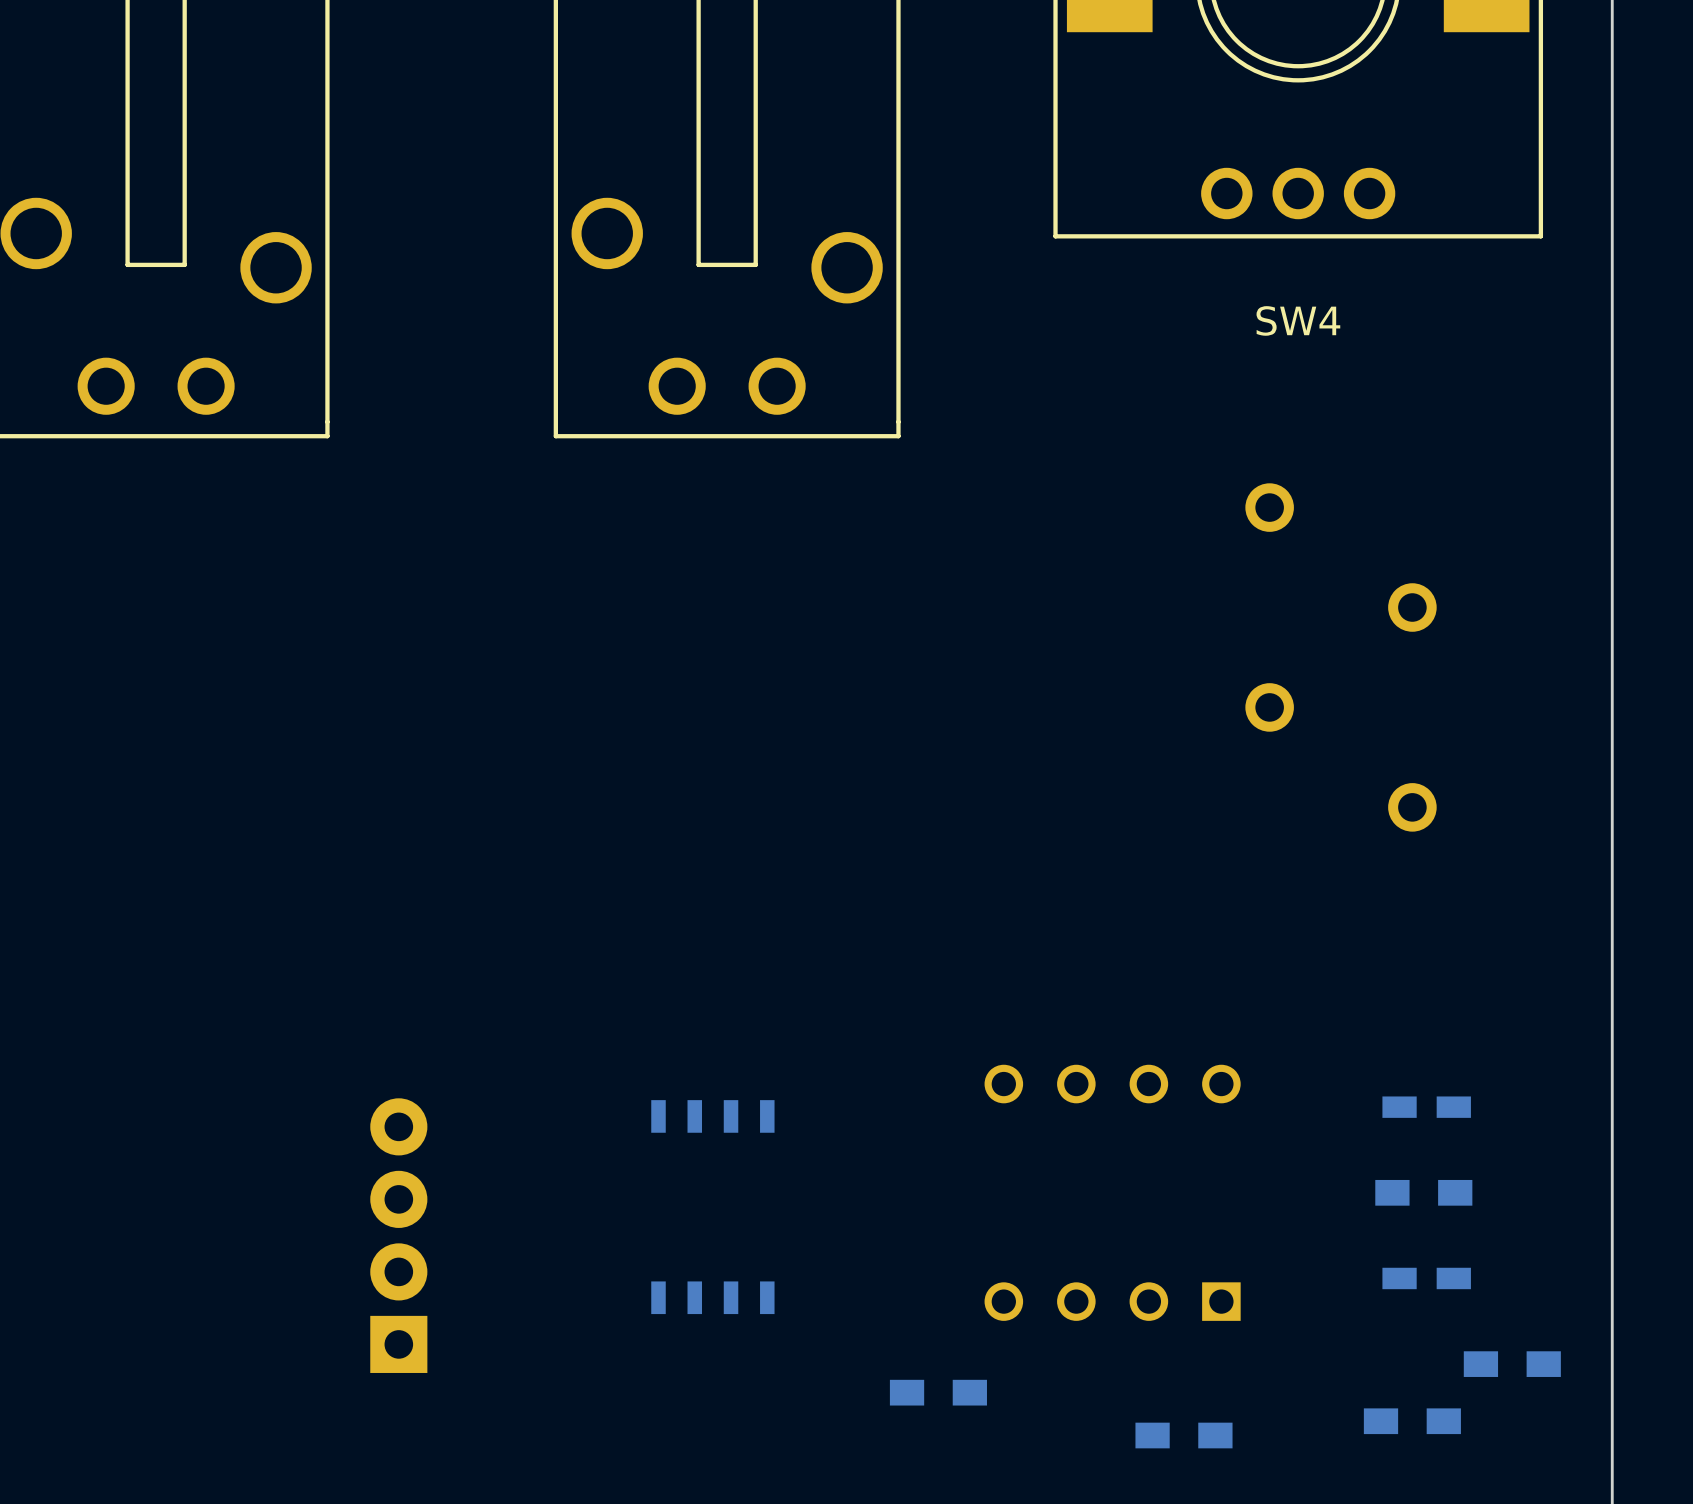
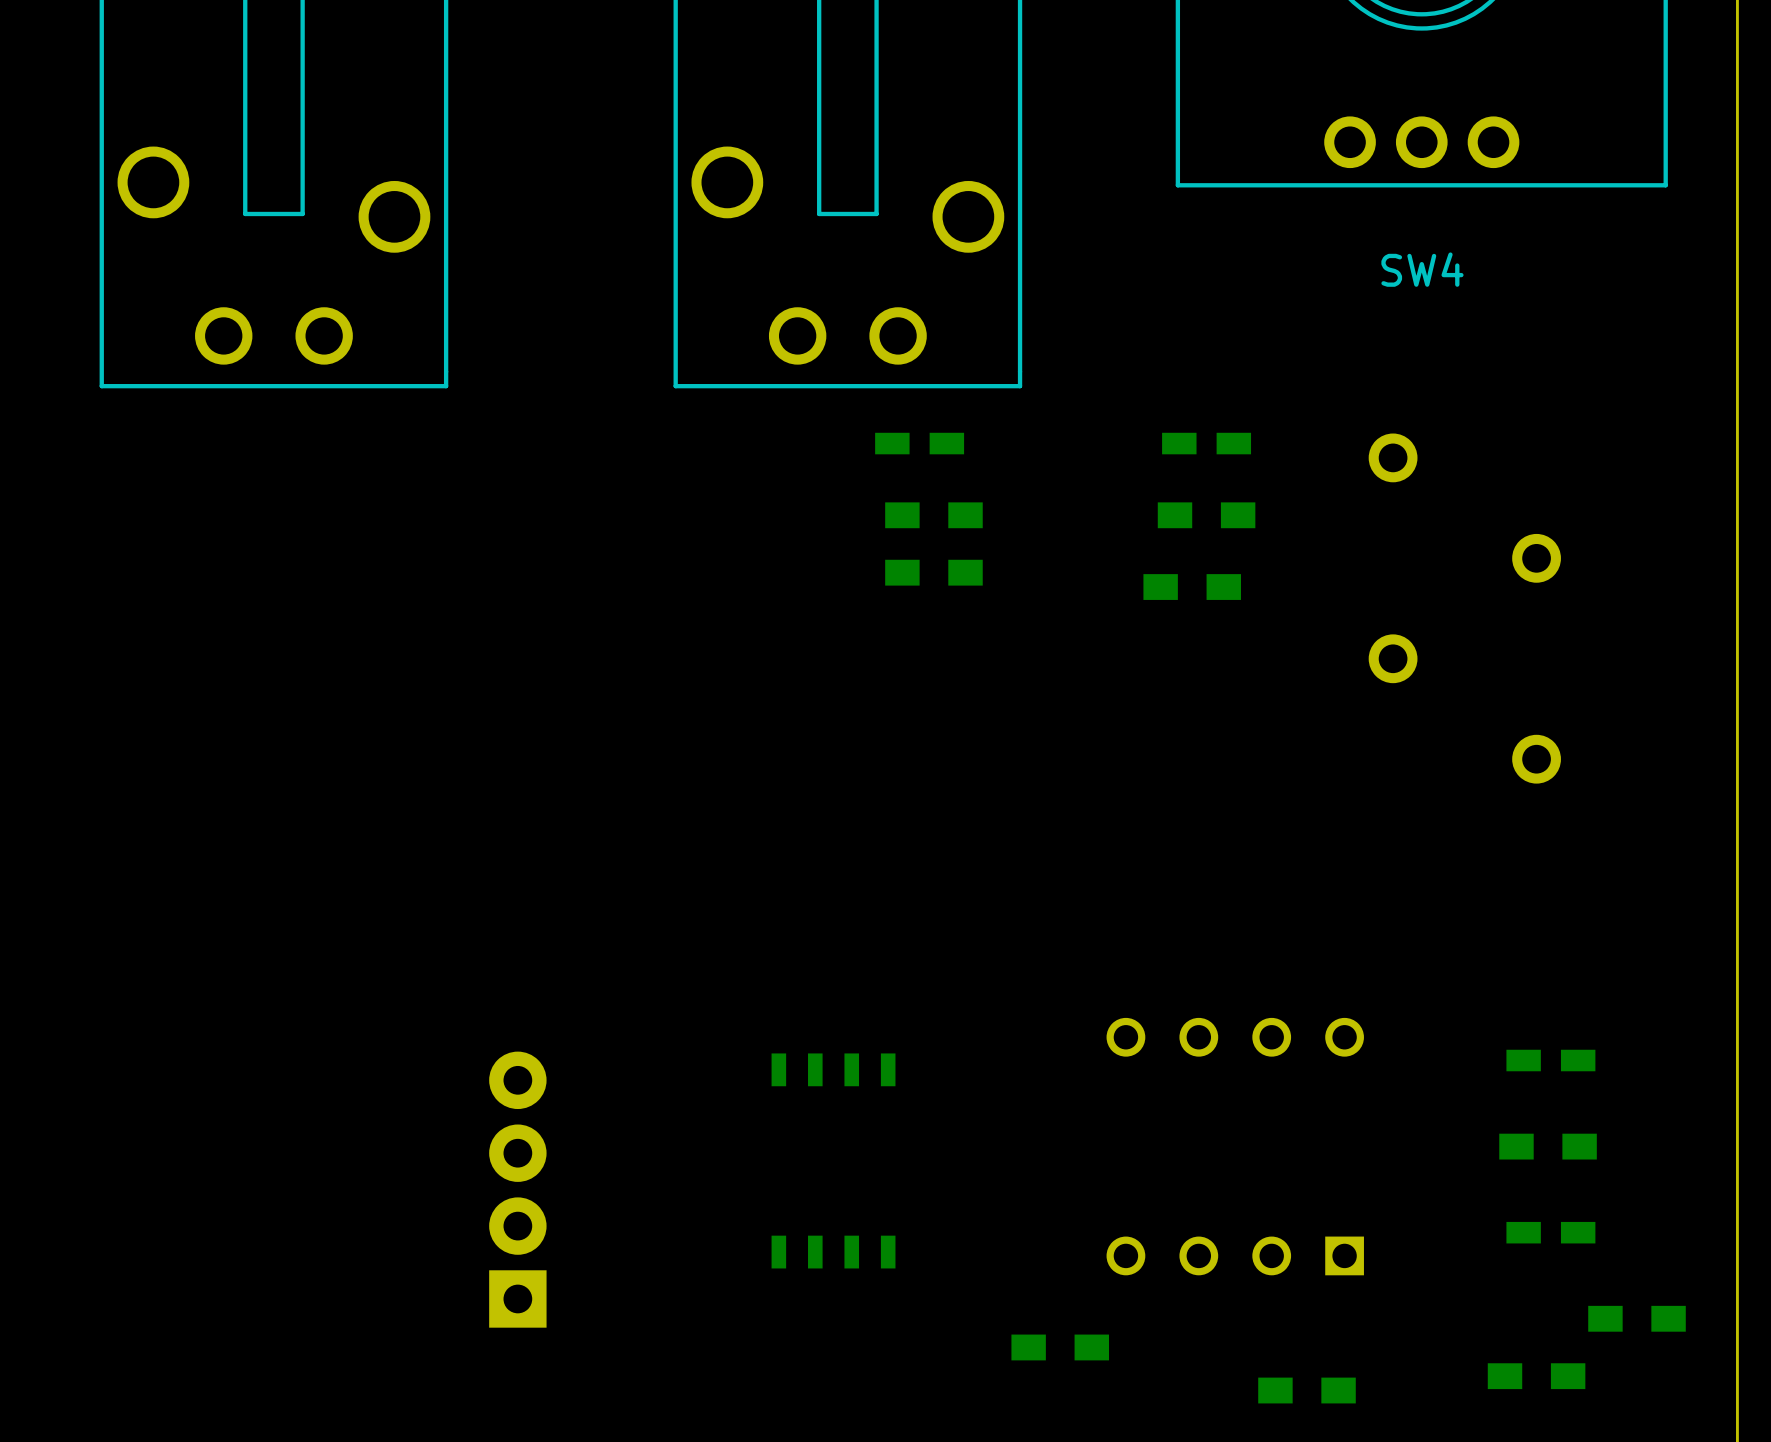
part: none -> (919, 443)
part: none -> (1206, 443)
part: none -> (933, 515)
part: none -> (1206, 515)
part: none -> (933, 572)
part: none -> (1192, 587)

